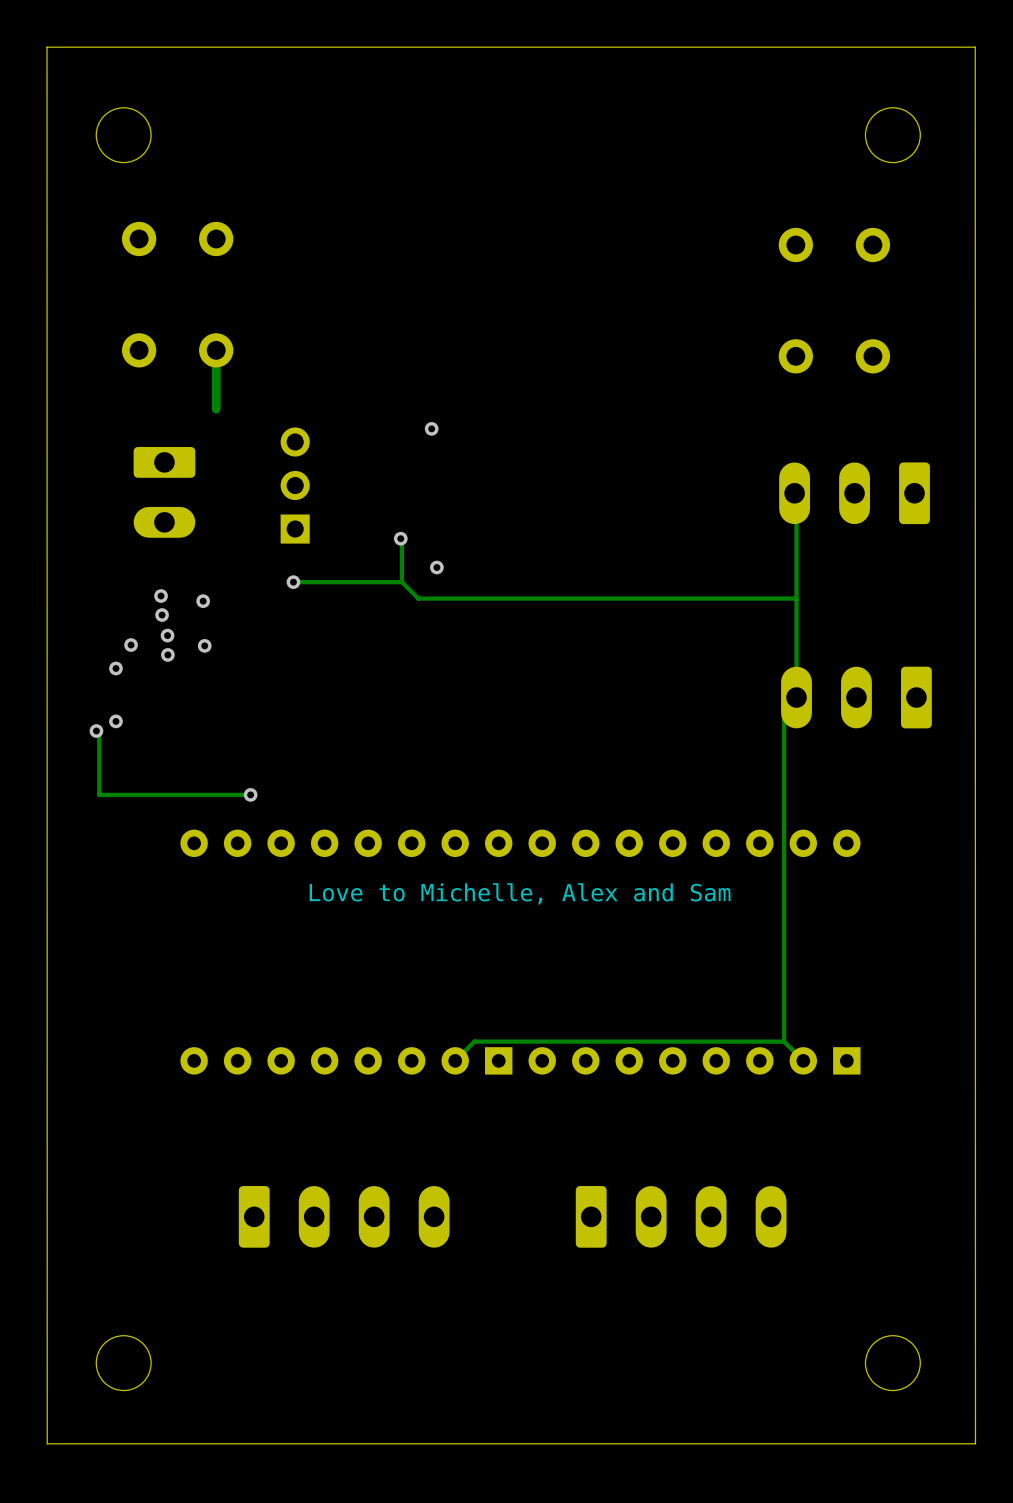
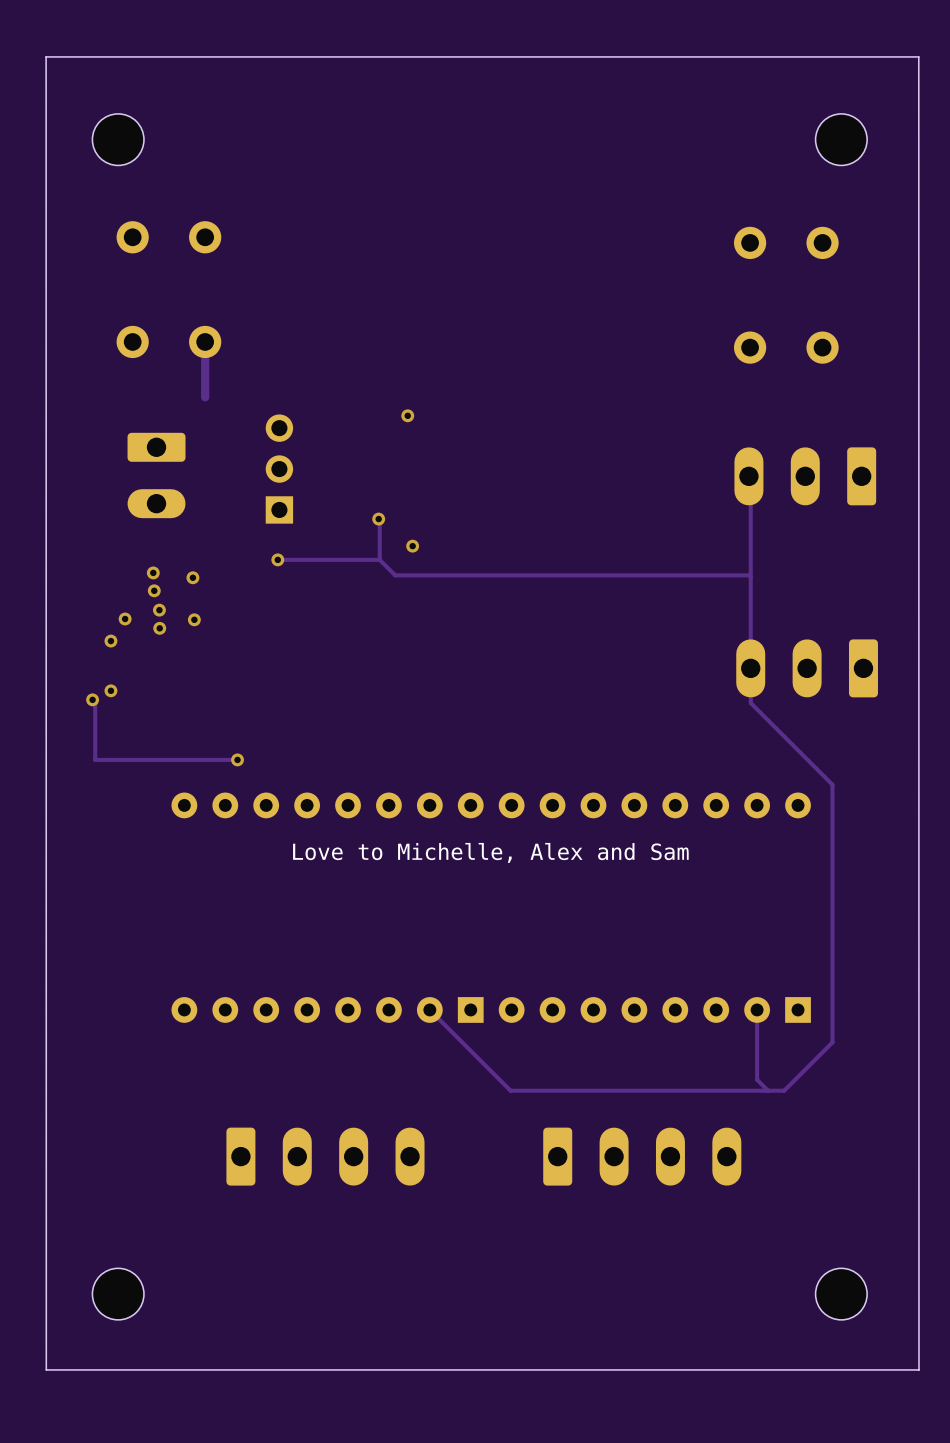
track: (784, 710) (784, 1041) -> none
track: (784, 1041) (803, 1060) -> (768, 1090) (757, 1079) (757, 1009)
track: (784, 1041) (474, 1041) (455, 1060) -> (750, 668) (750, 702) (832, 784) (832, 1042) (784, 1090) (510, 1090) (429, 1009)

